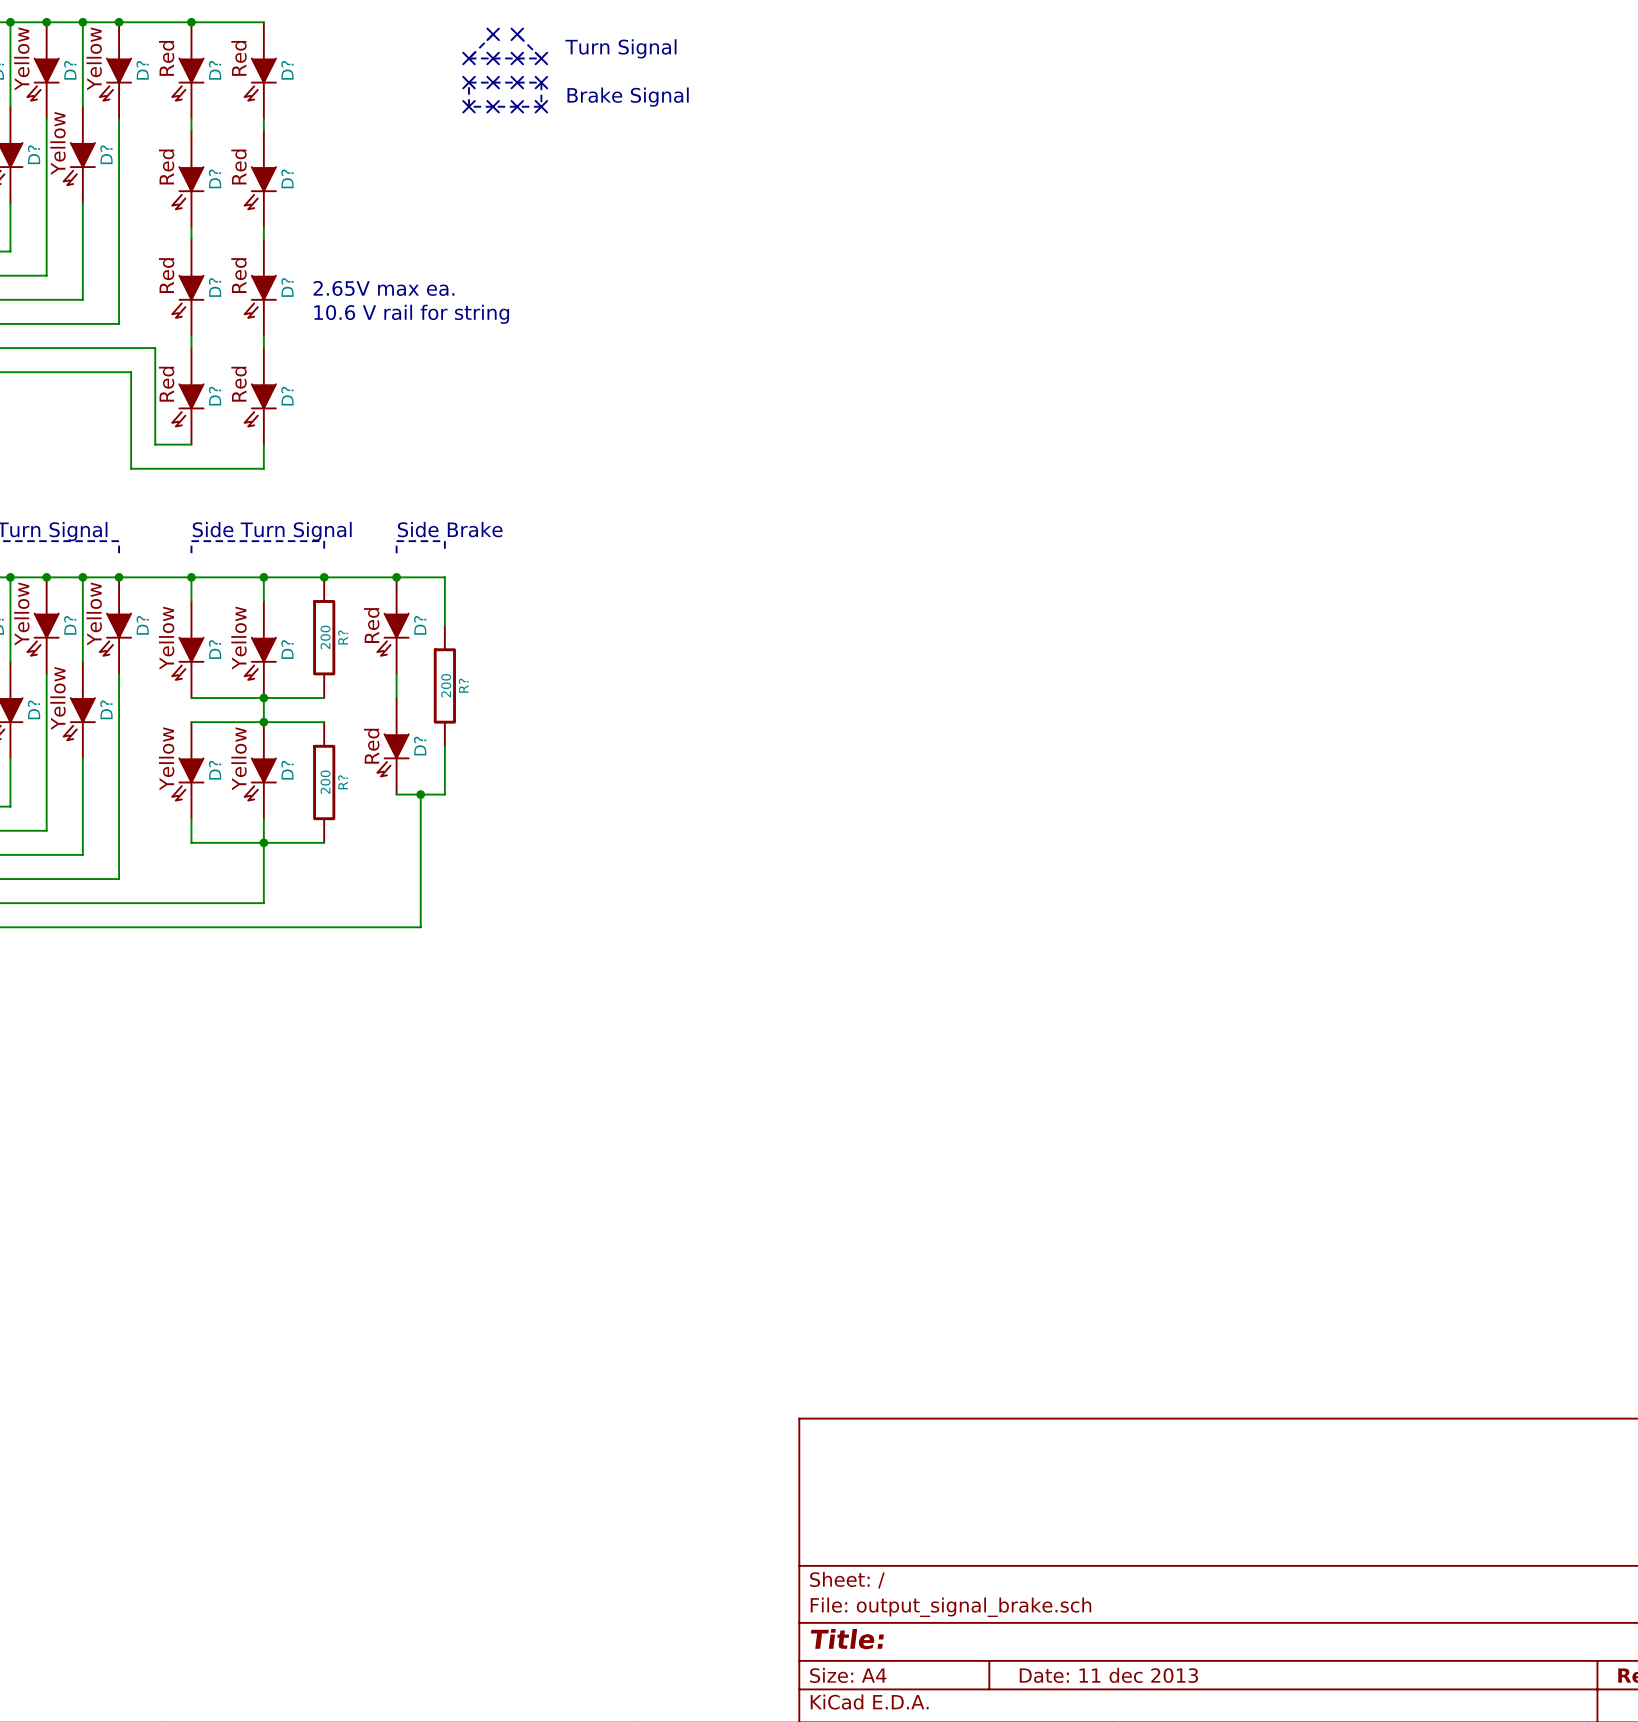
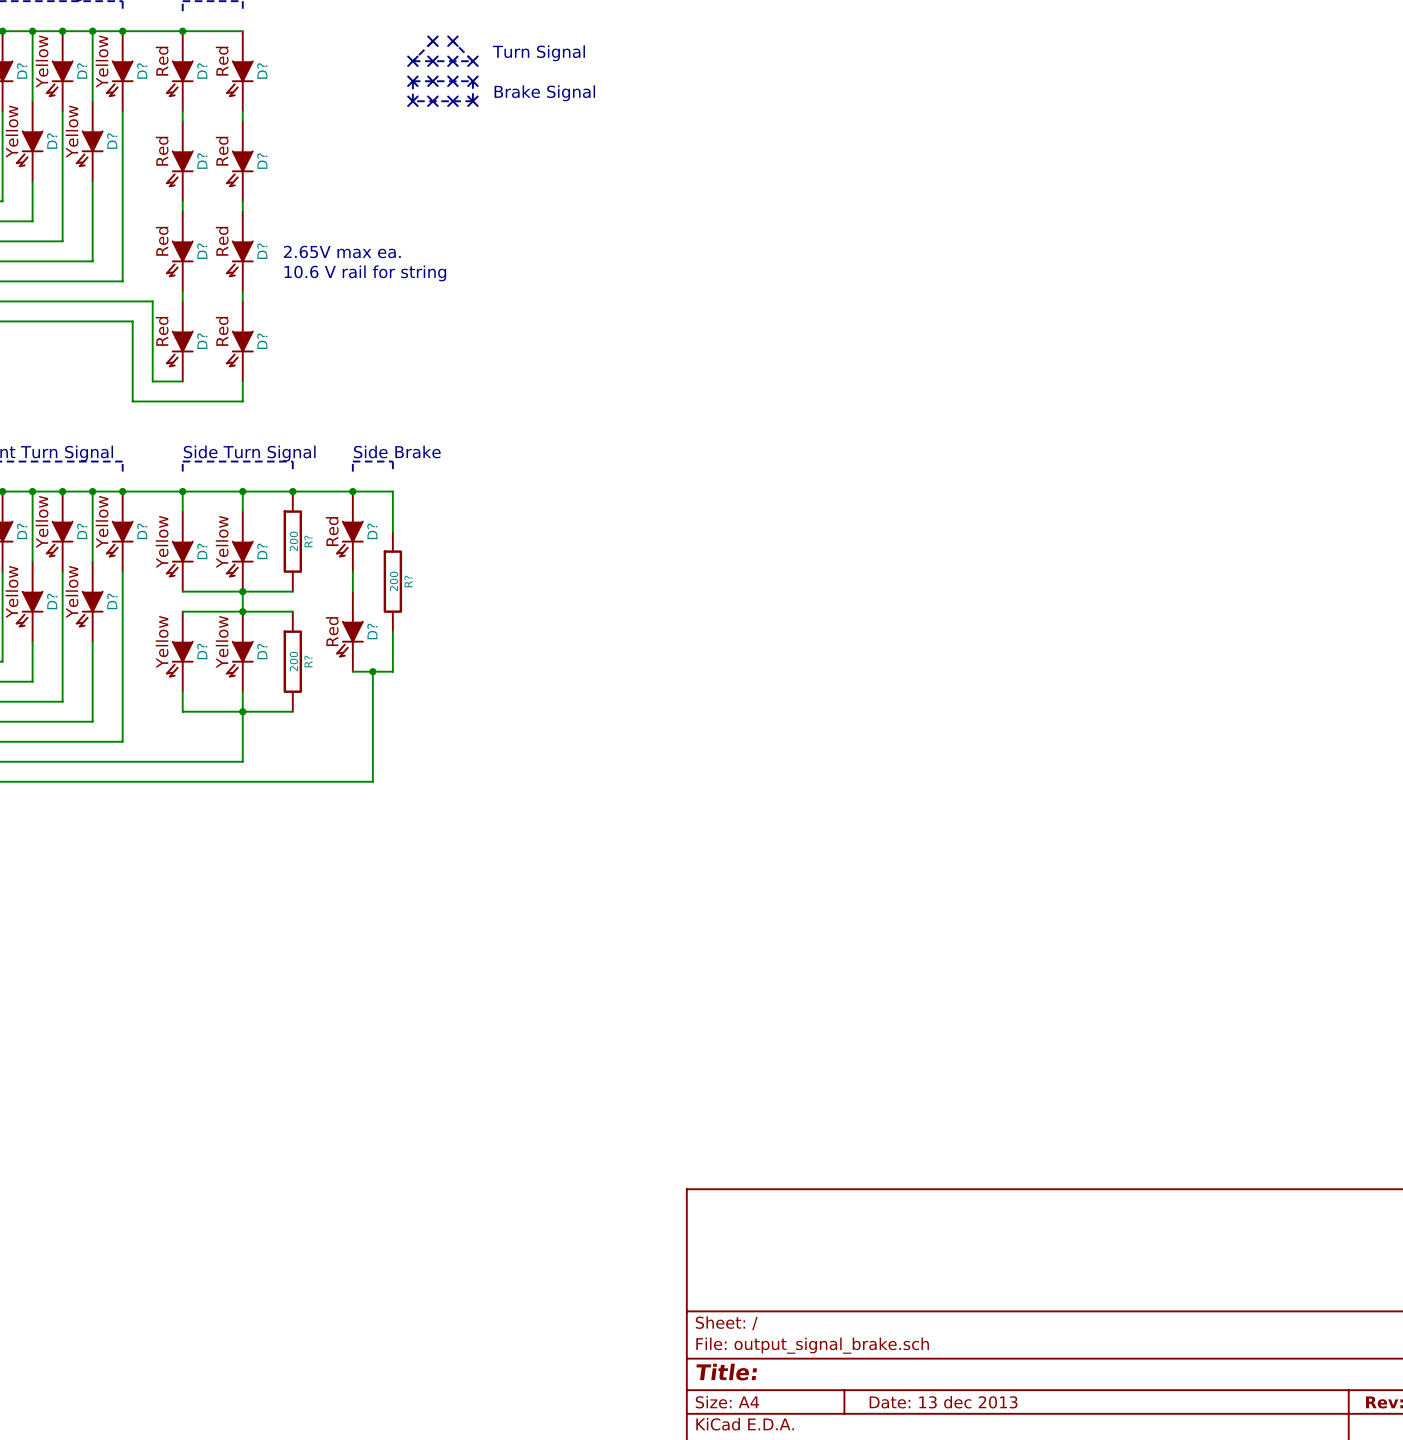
title block: Date: 11 dec 2013 (1108, 1675) -> Date: 13 dec 2013 (943, 1402)

